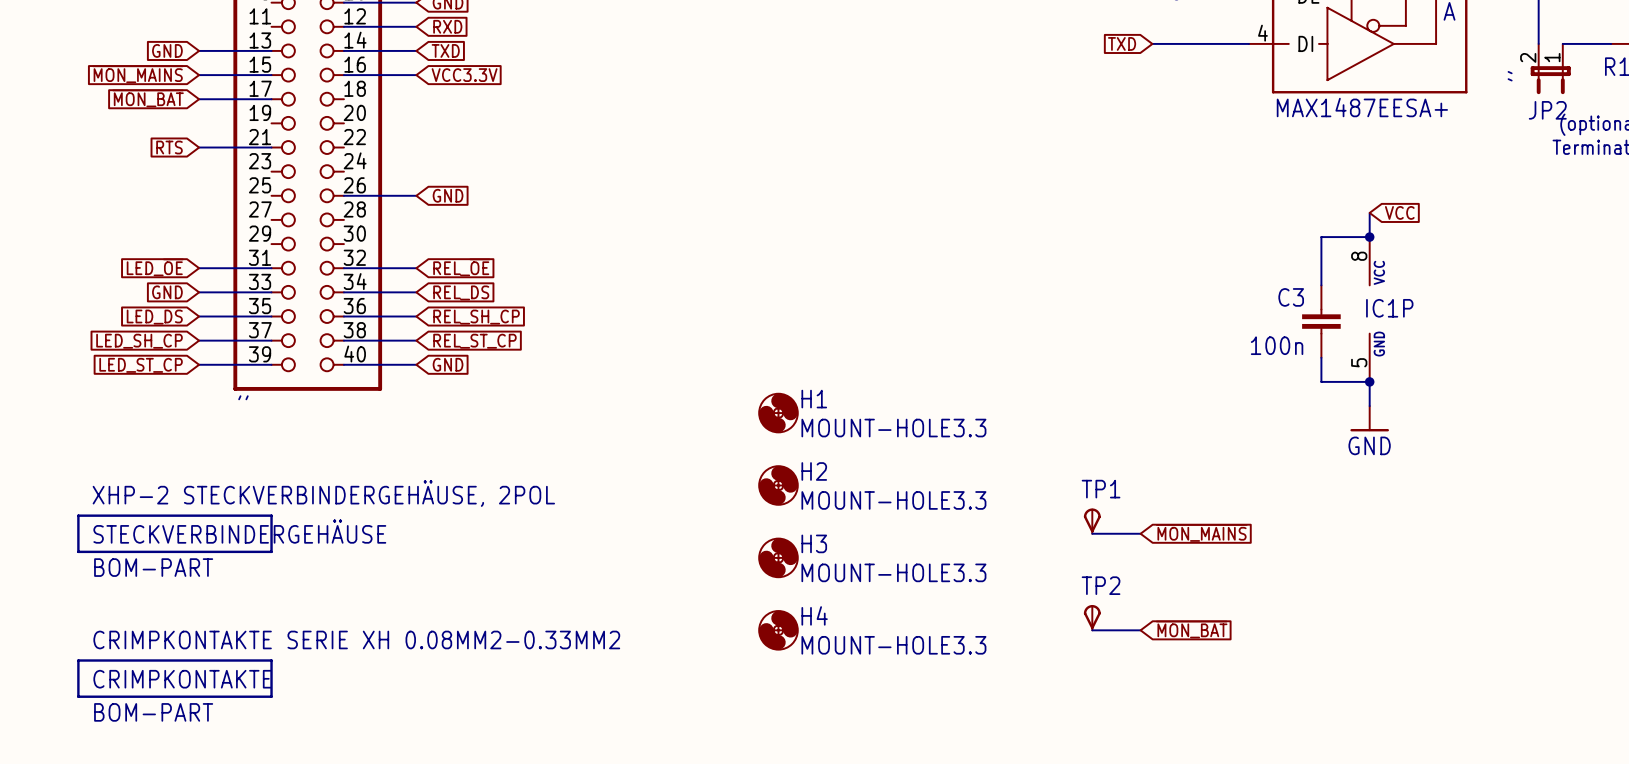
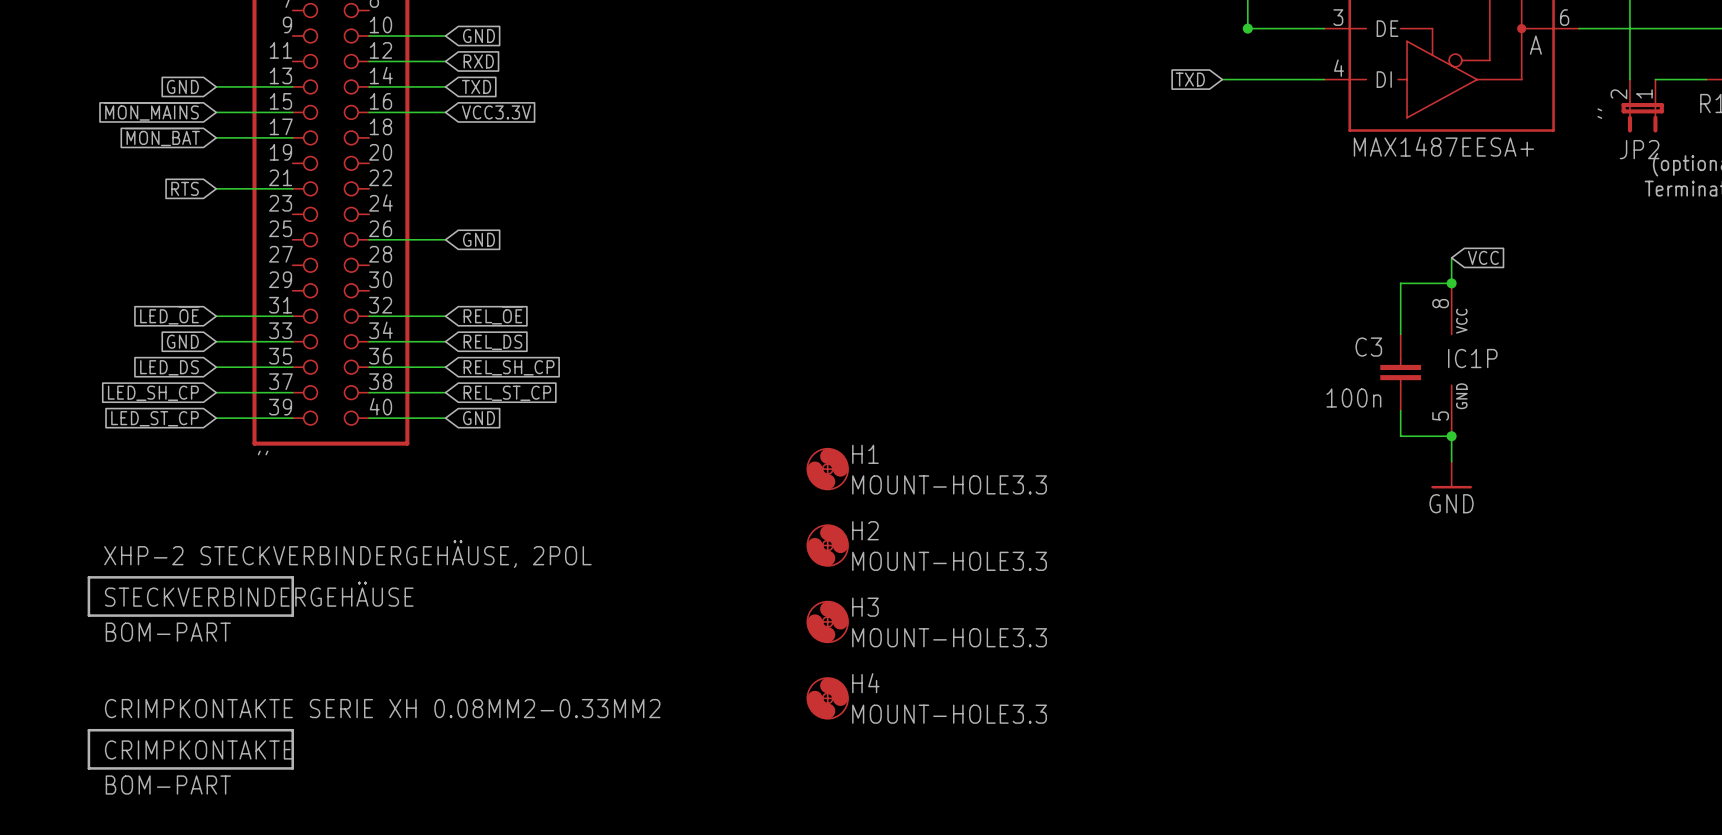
TP1: (1092, 521) -> none
global label: ~{MON_MAINS} (1201, 532) -> none
wire: (1092, 533) (1140, 533) -> none
TP2: (1092, 617) -> none
global label: ~{MON_BAT} (1191, 629) -> none
wire: (1092, 630) (1140, 630) -> none

